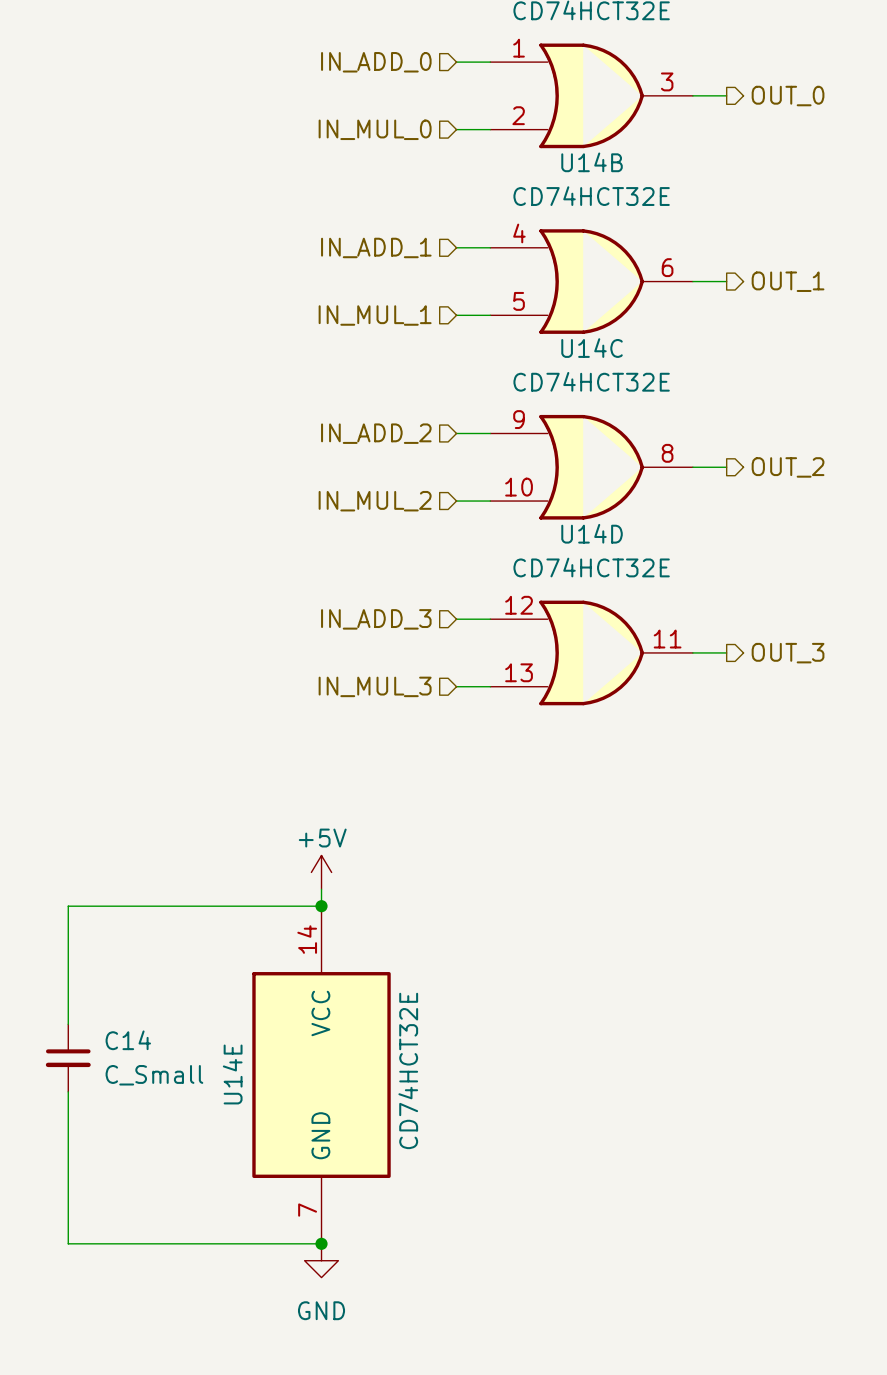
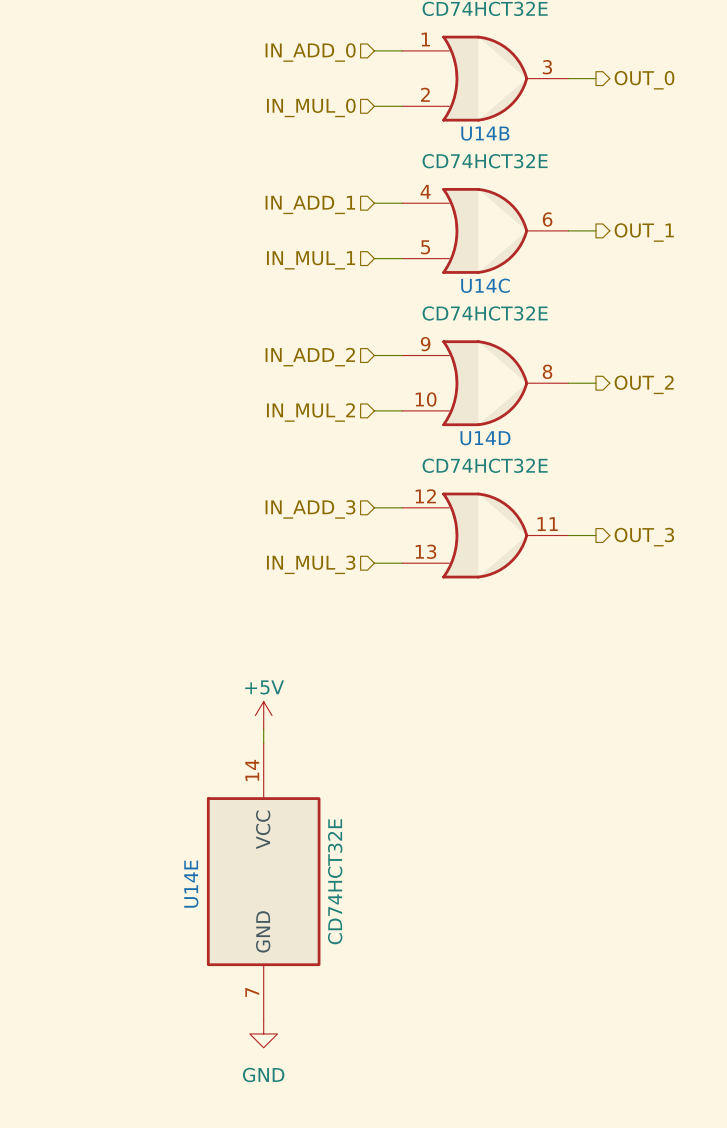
wire: (321, 906) (68, 906) (68, 1024) -> none
junction: (321, 906) -> none
C14: C_Small (68, 1058) -> none
wire: (68, 1091) (68, 1243) (321, 1243) -> none
junction: (321, 1243) -> none

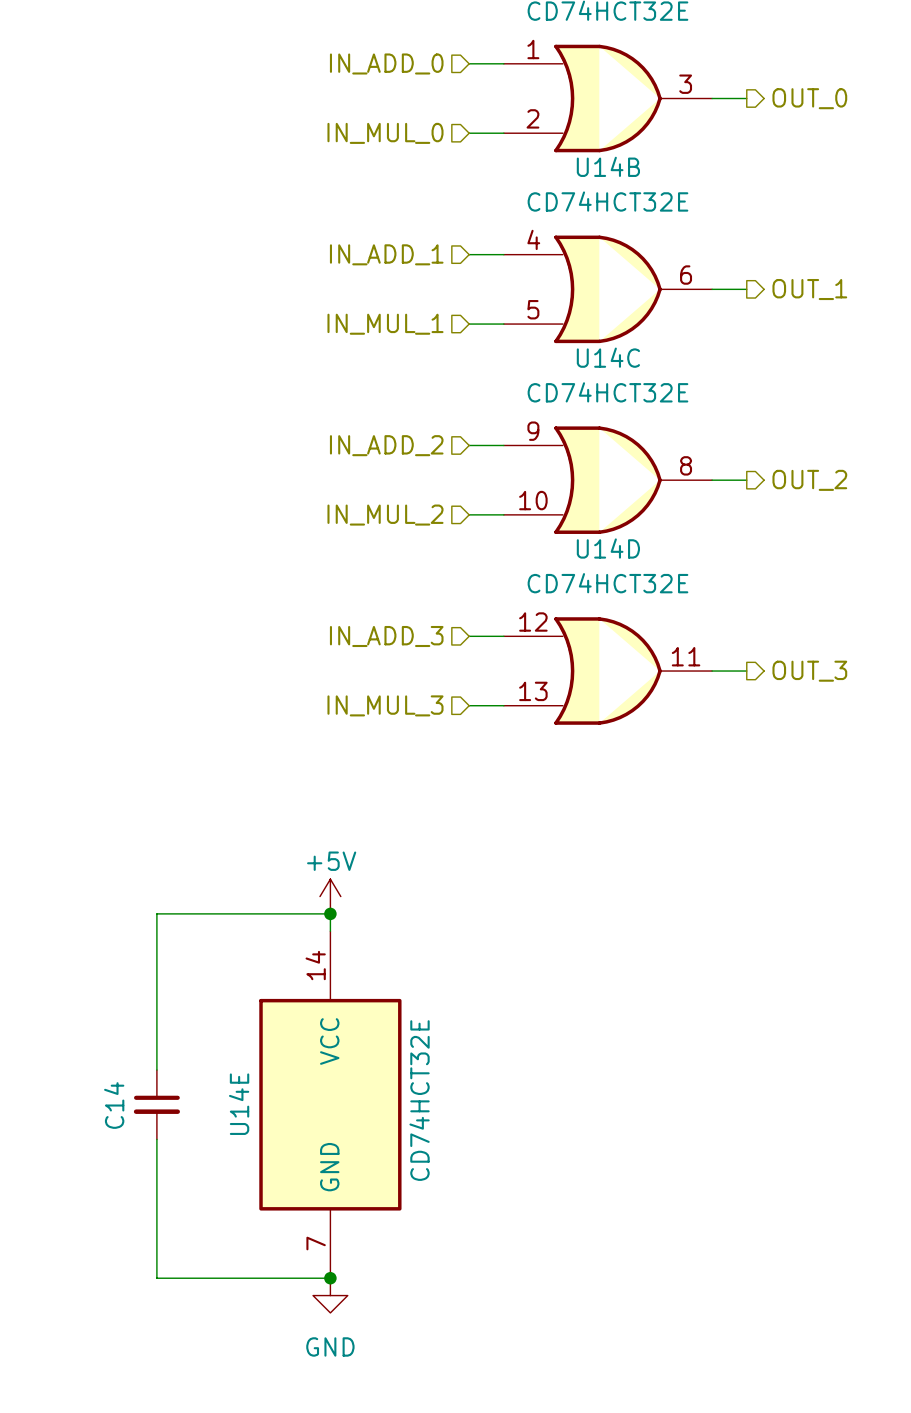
wire: none -> (330, 913) (156, 913) (156, 1070)
junction: none -> (330, 913)
C14: none -> (156, 1104)
wire: none -> (156, 1139) (156, 1278) (330, 1278)
junction: none -> (330, 1278)

